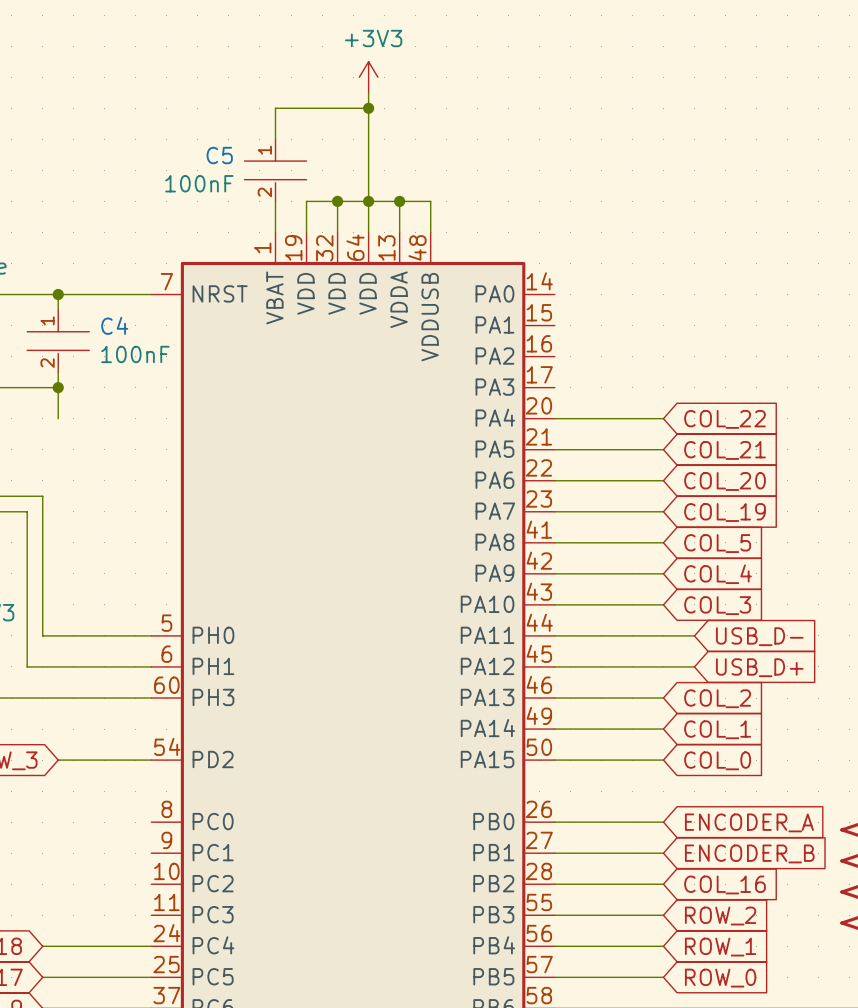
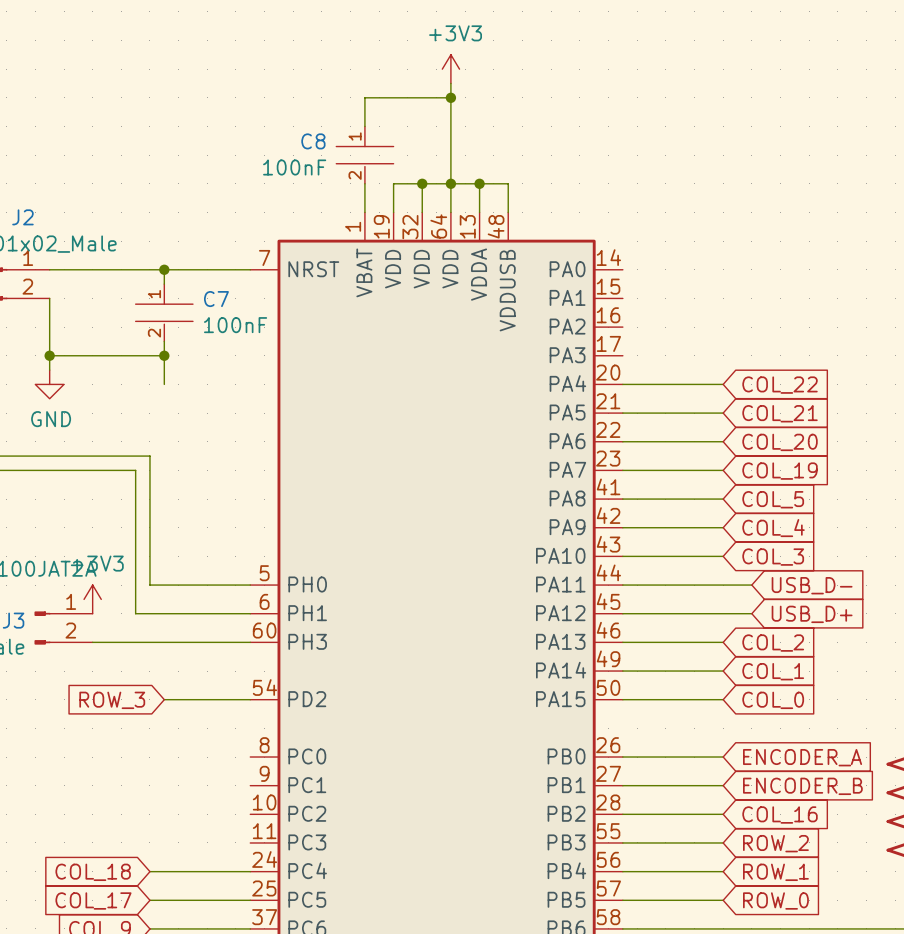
C5 name: C5 (219, 155) -> C8 (313, 141)
C4 name: C4 (114, 325) -> C7 (216, 299)

